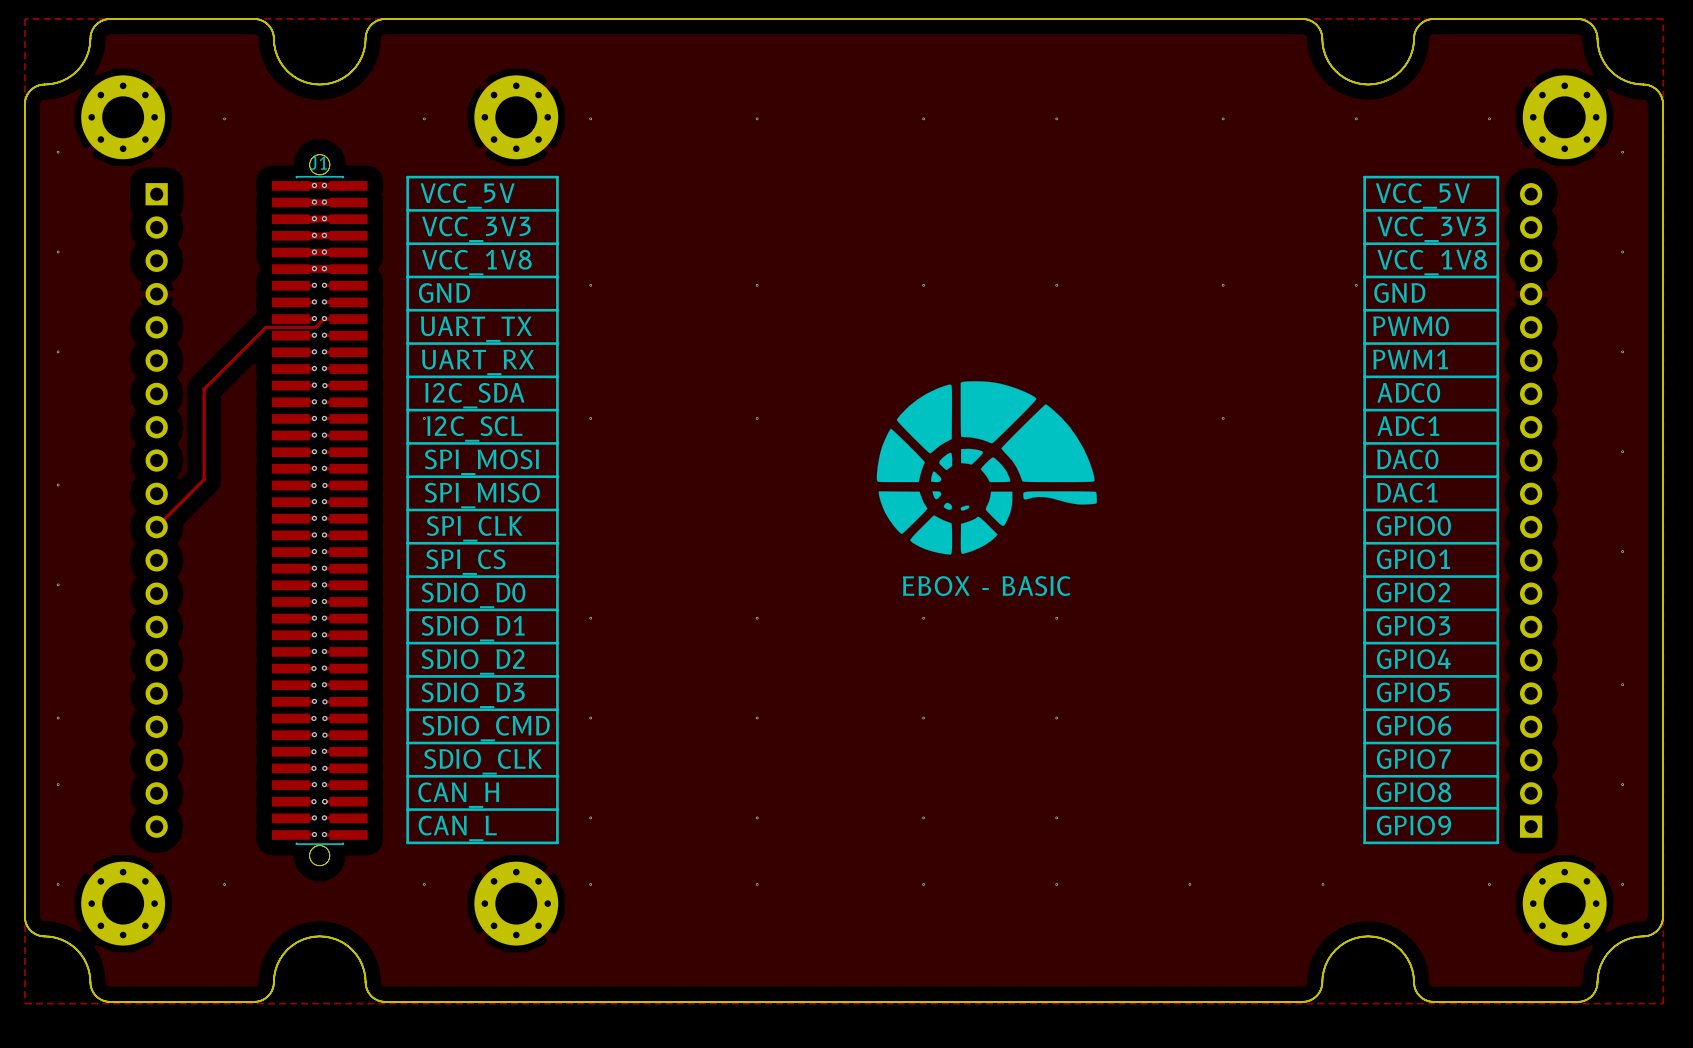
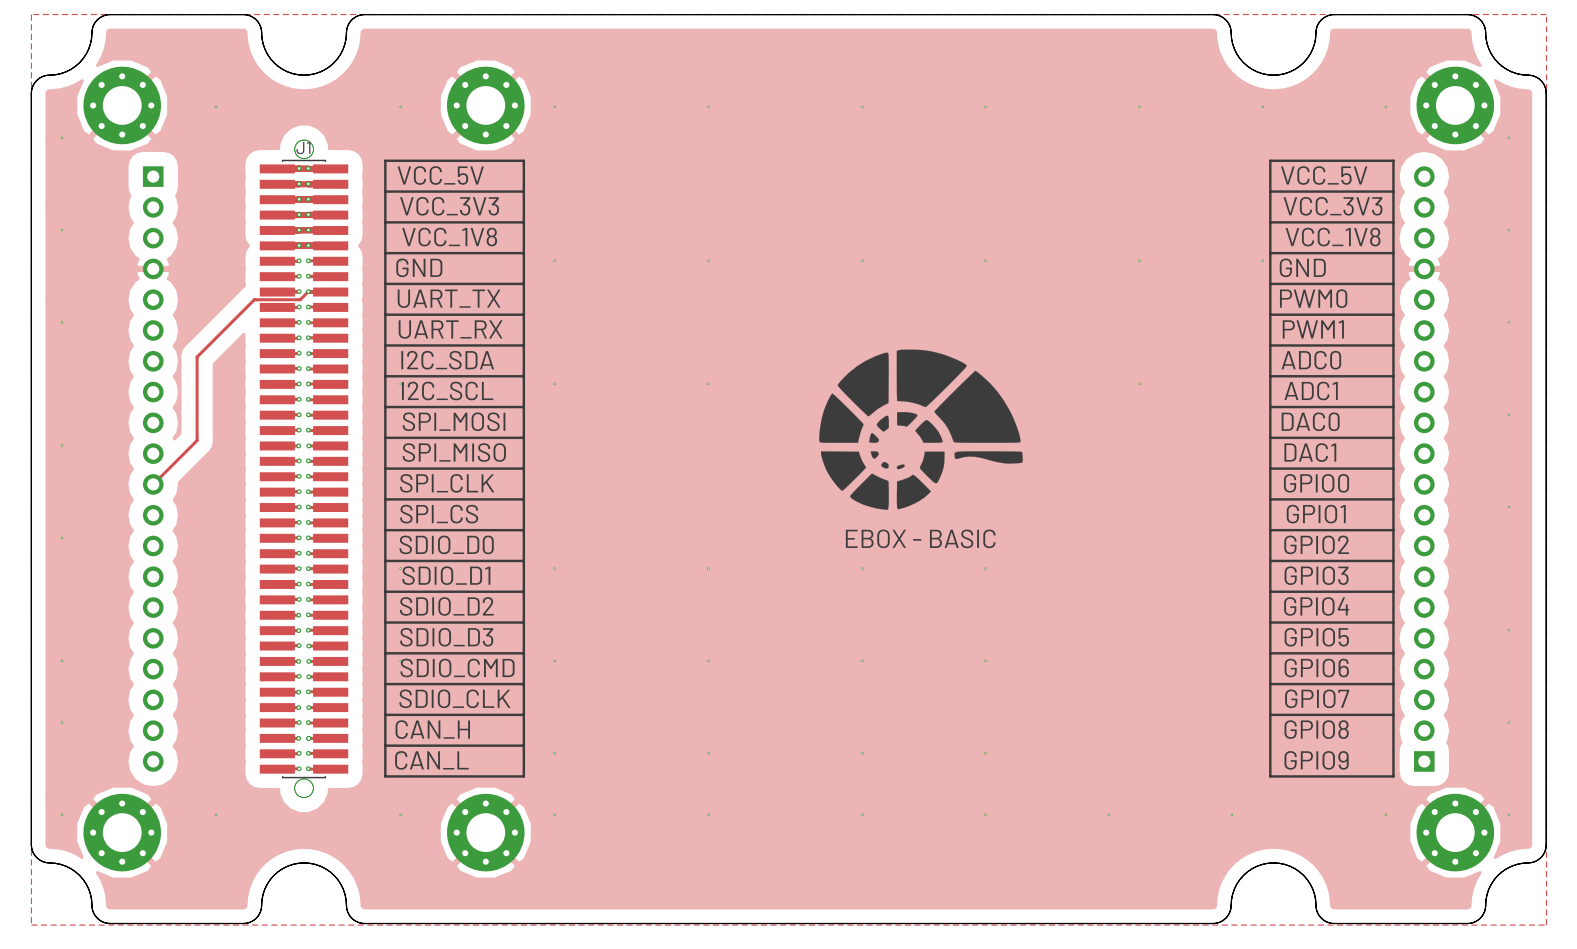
line: (1364, 808) (1497, 808) -> none

